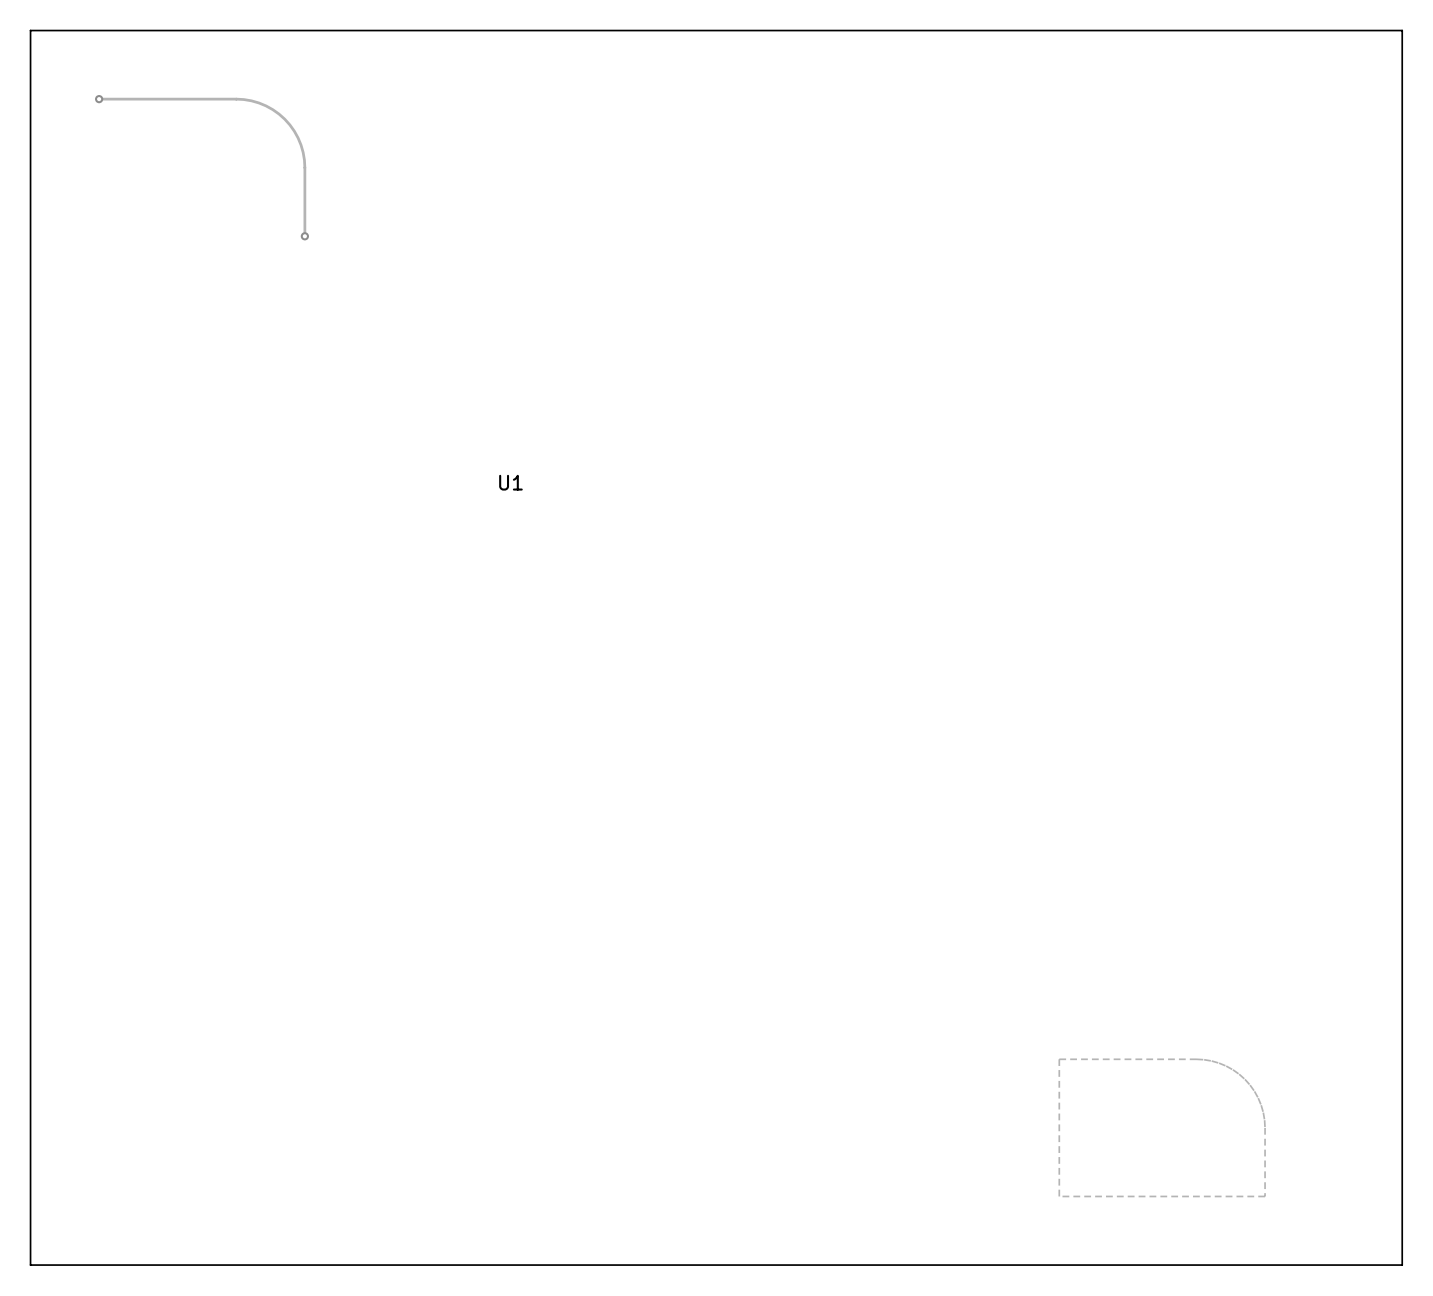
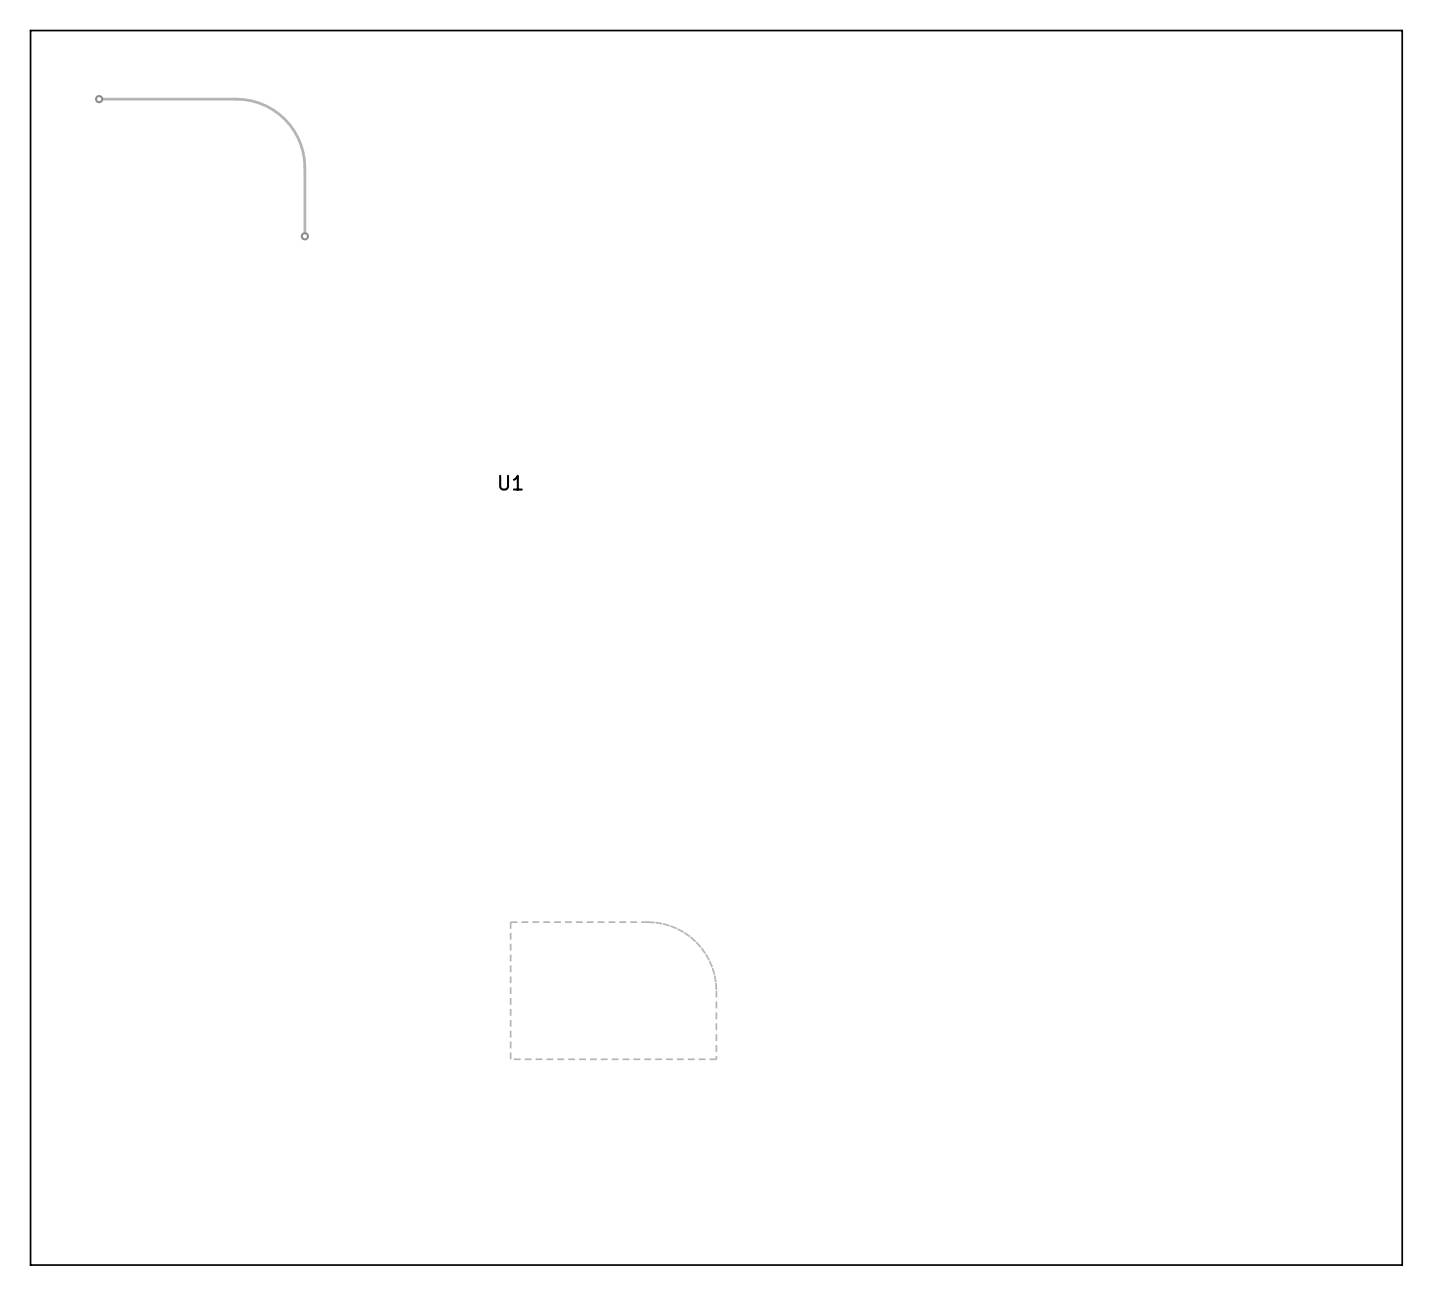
zone outline: none -> (510, 922) (655, 922) (670, 925) (684, 932) (701, 947) (709, 960) (714, 975) (716, 1059) (510, 1059) (510, 922)
zone outline: (1059, 1059) (1204, 1059) (1219, 1063) (1232, 1069) (1250, 1085) (1258, 1098) (1263, 1112) (1265, 1196) (1059, 1196) (1059, 1059) -> none

